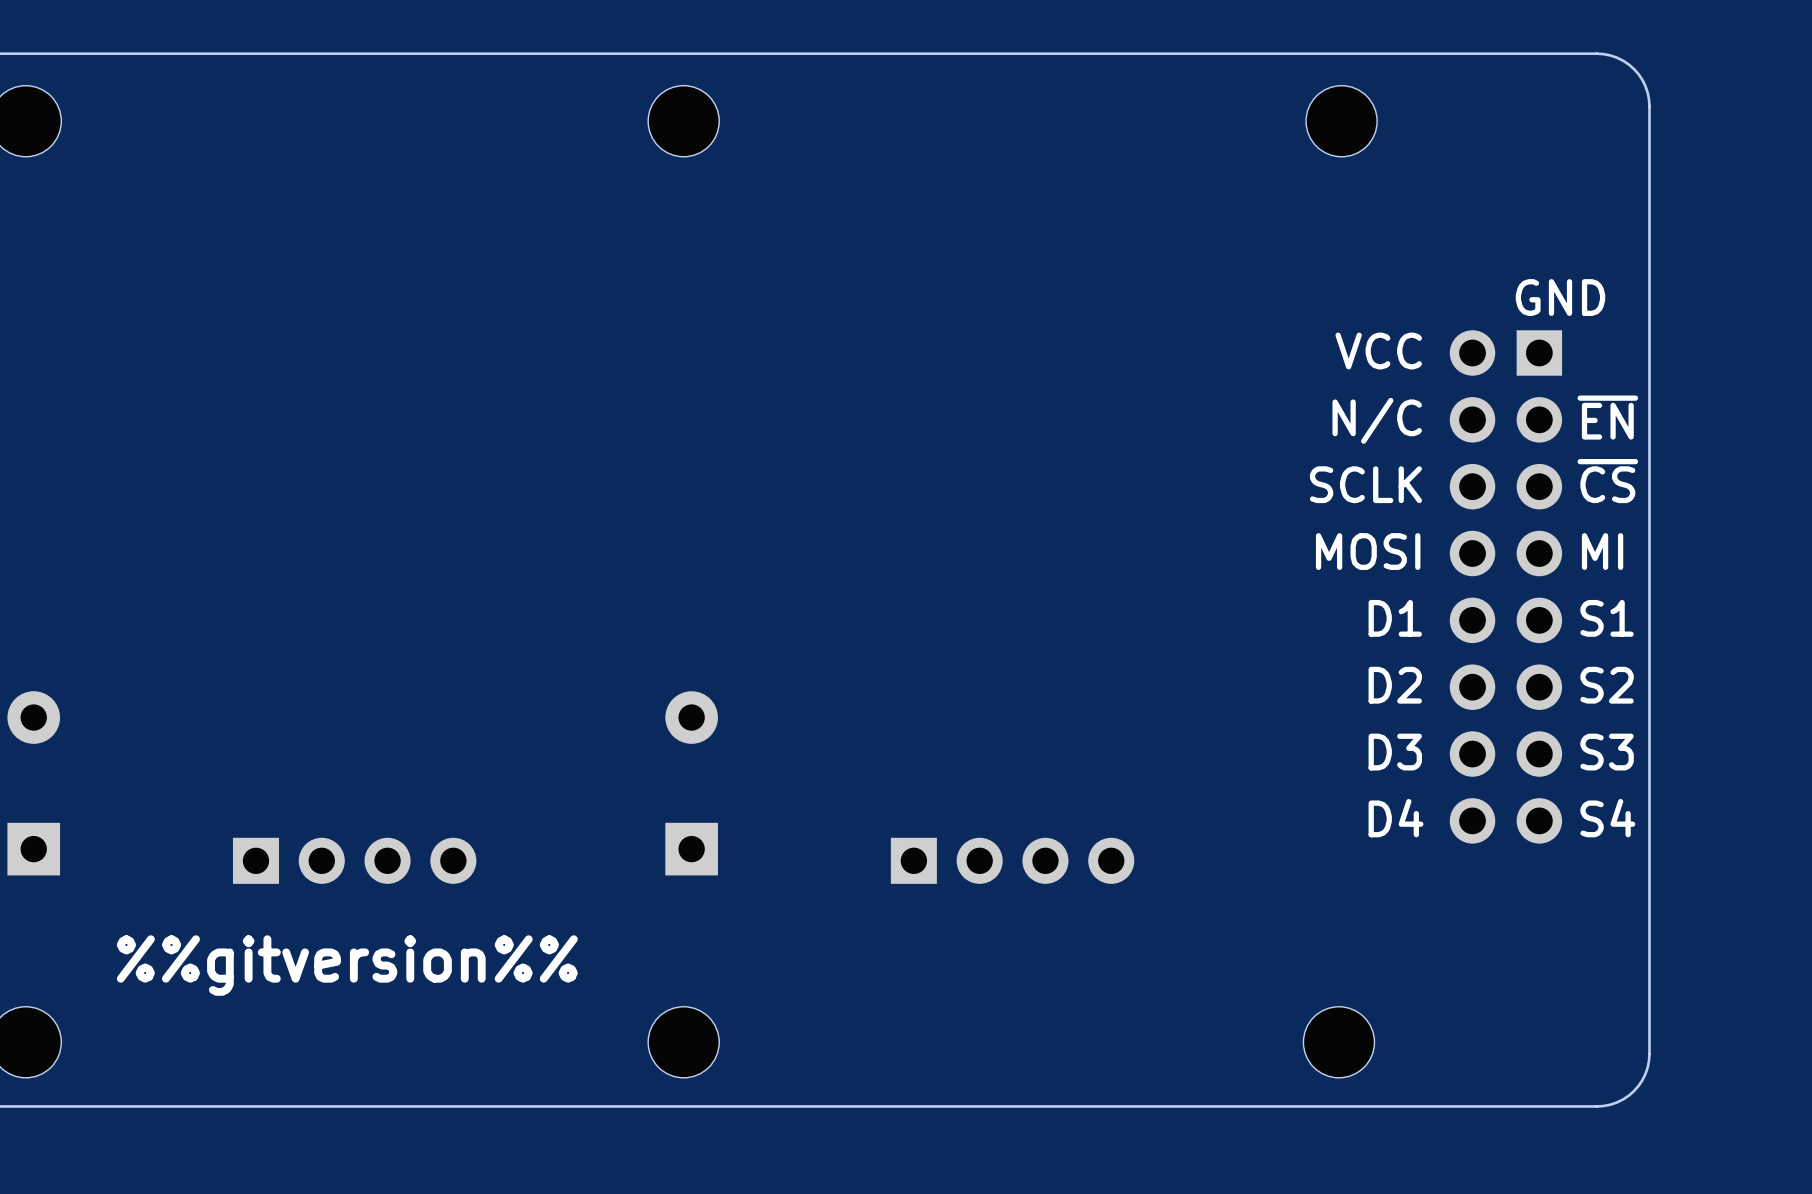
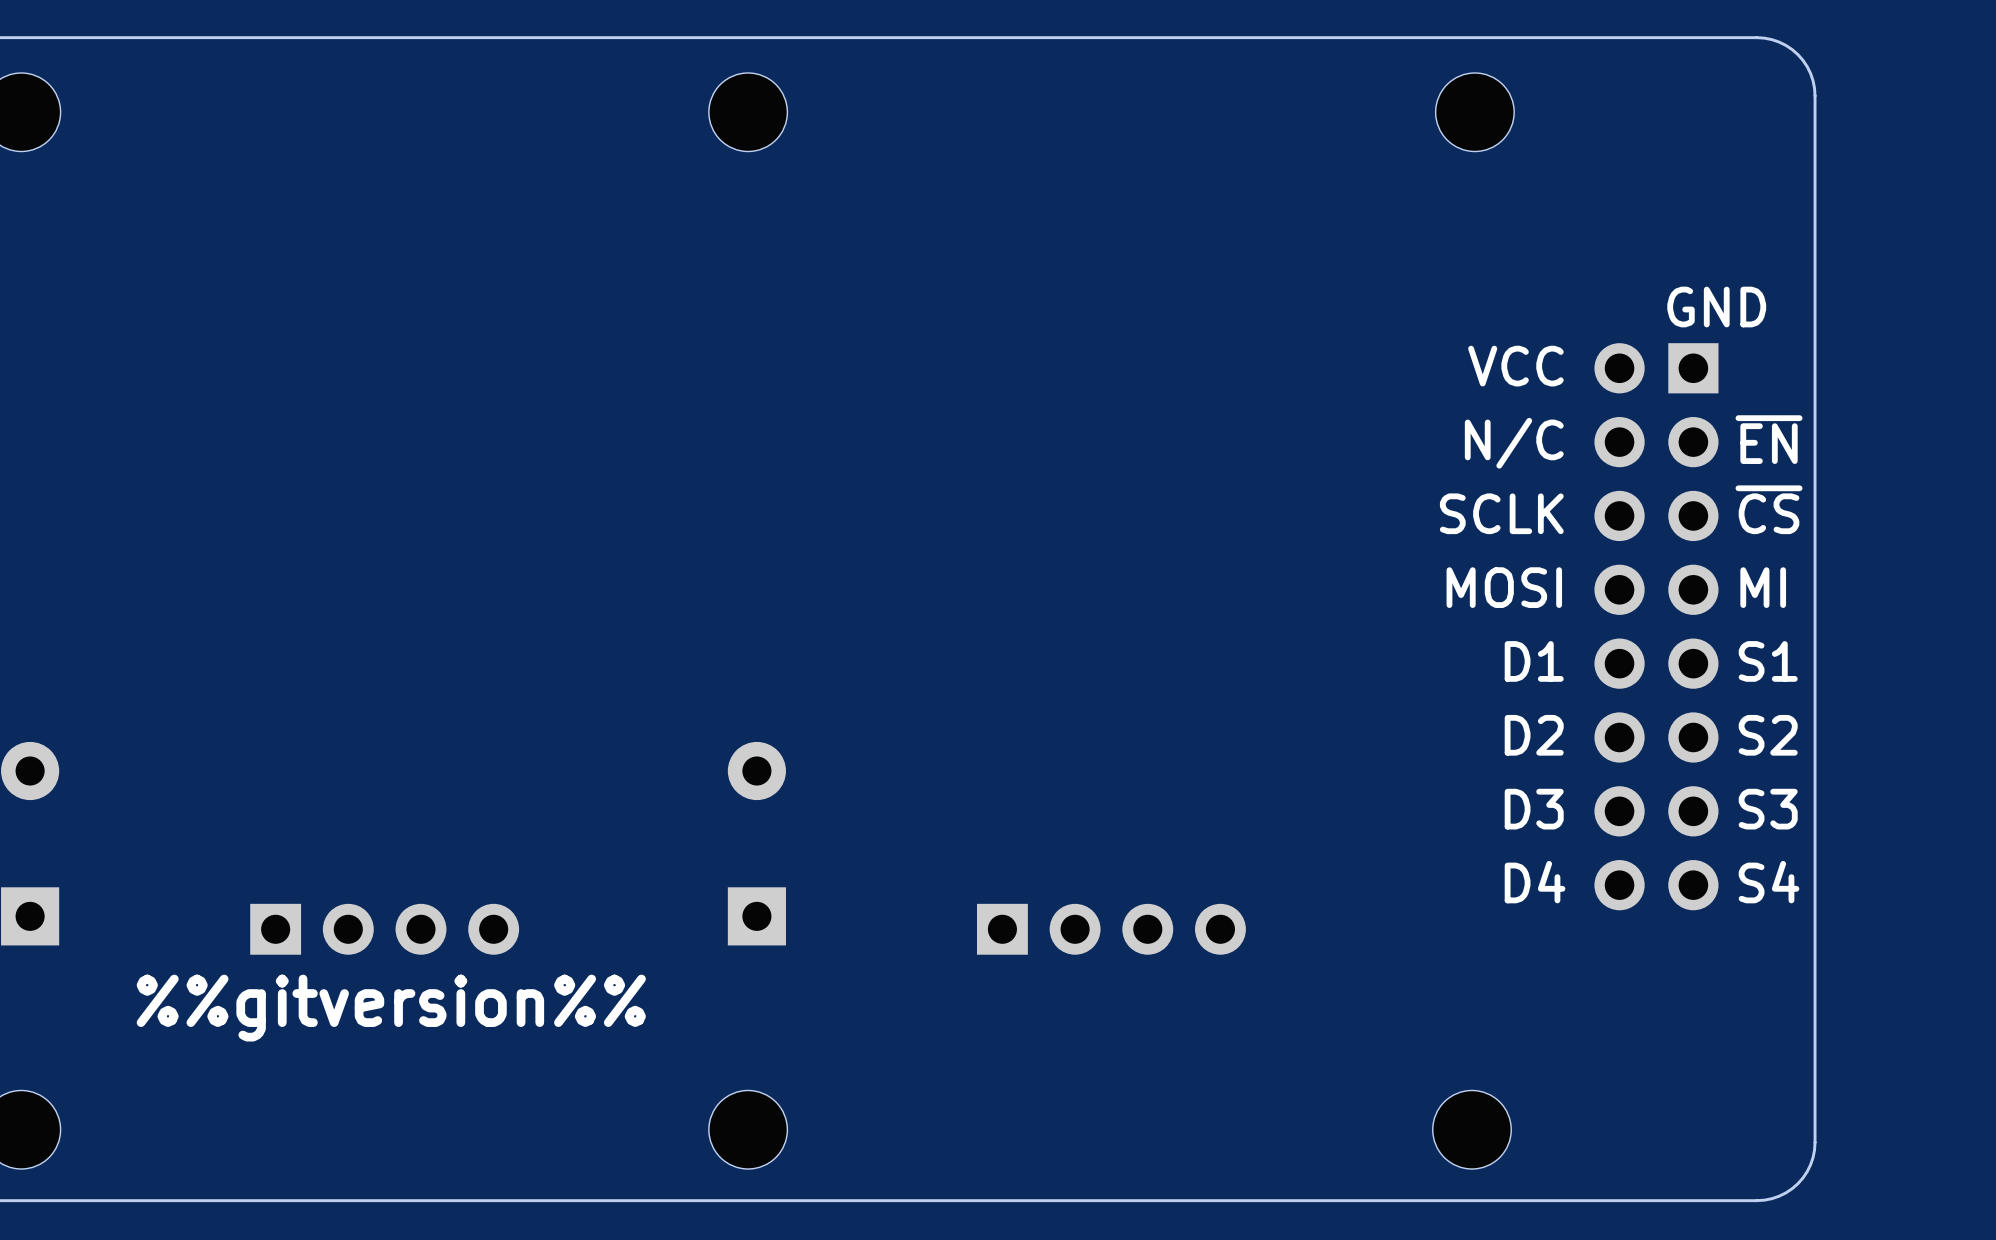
text position: %%gitversion%% (347, 965) -> %%gitversion%% (391, 1008)

